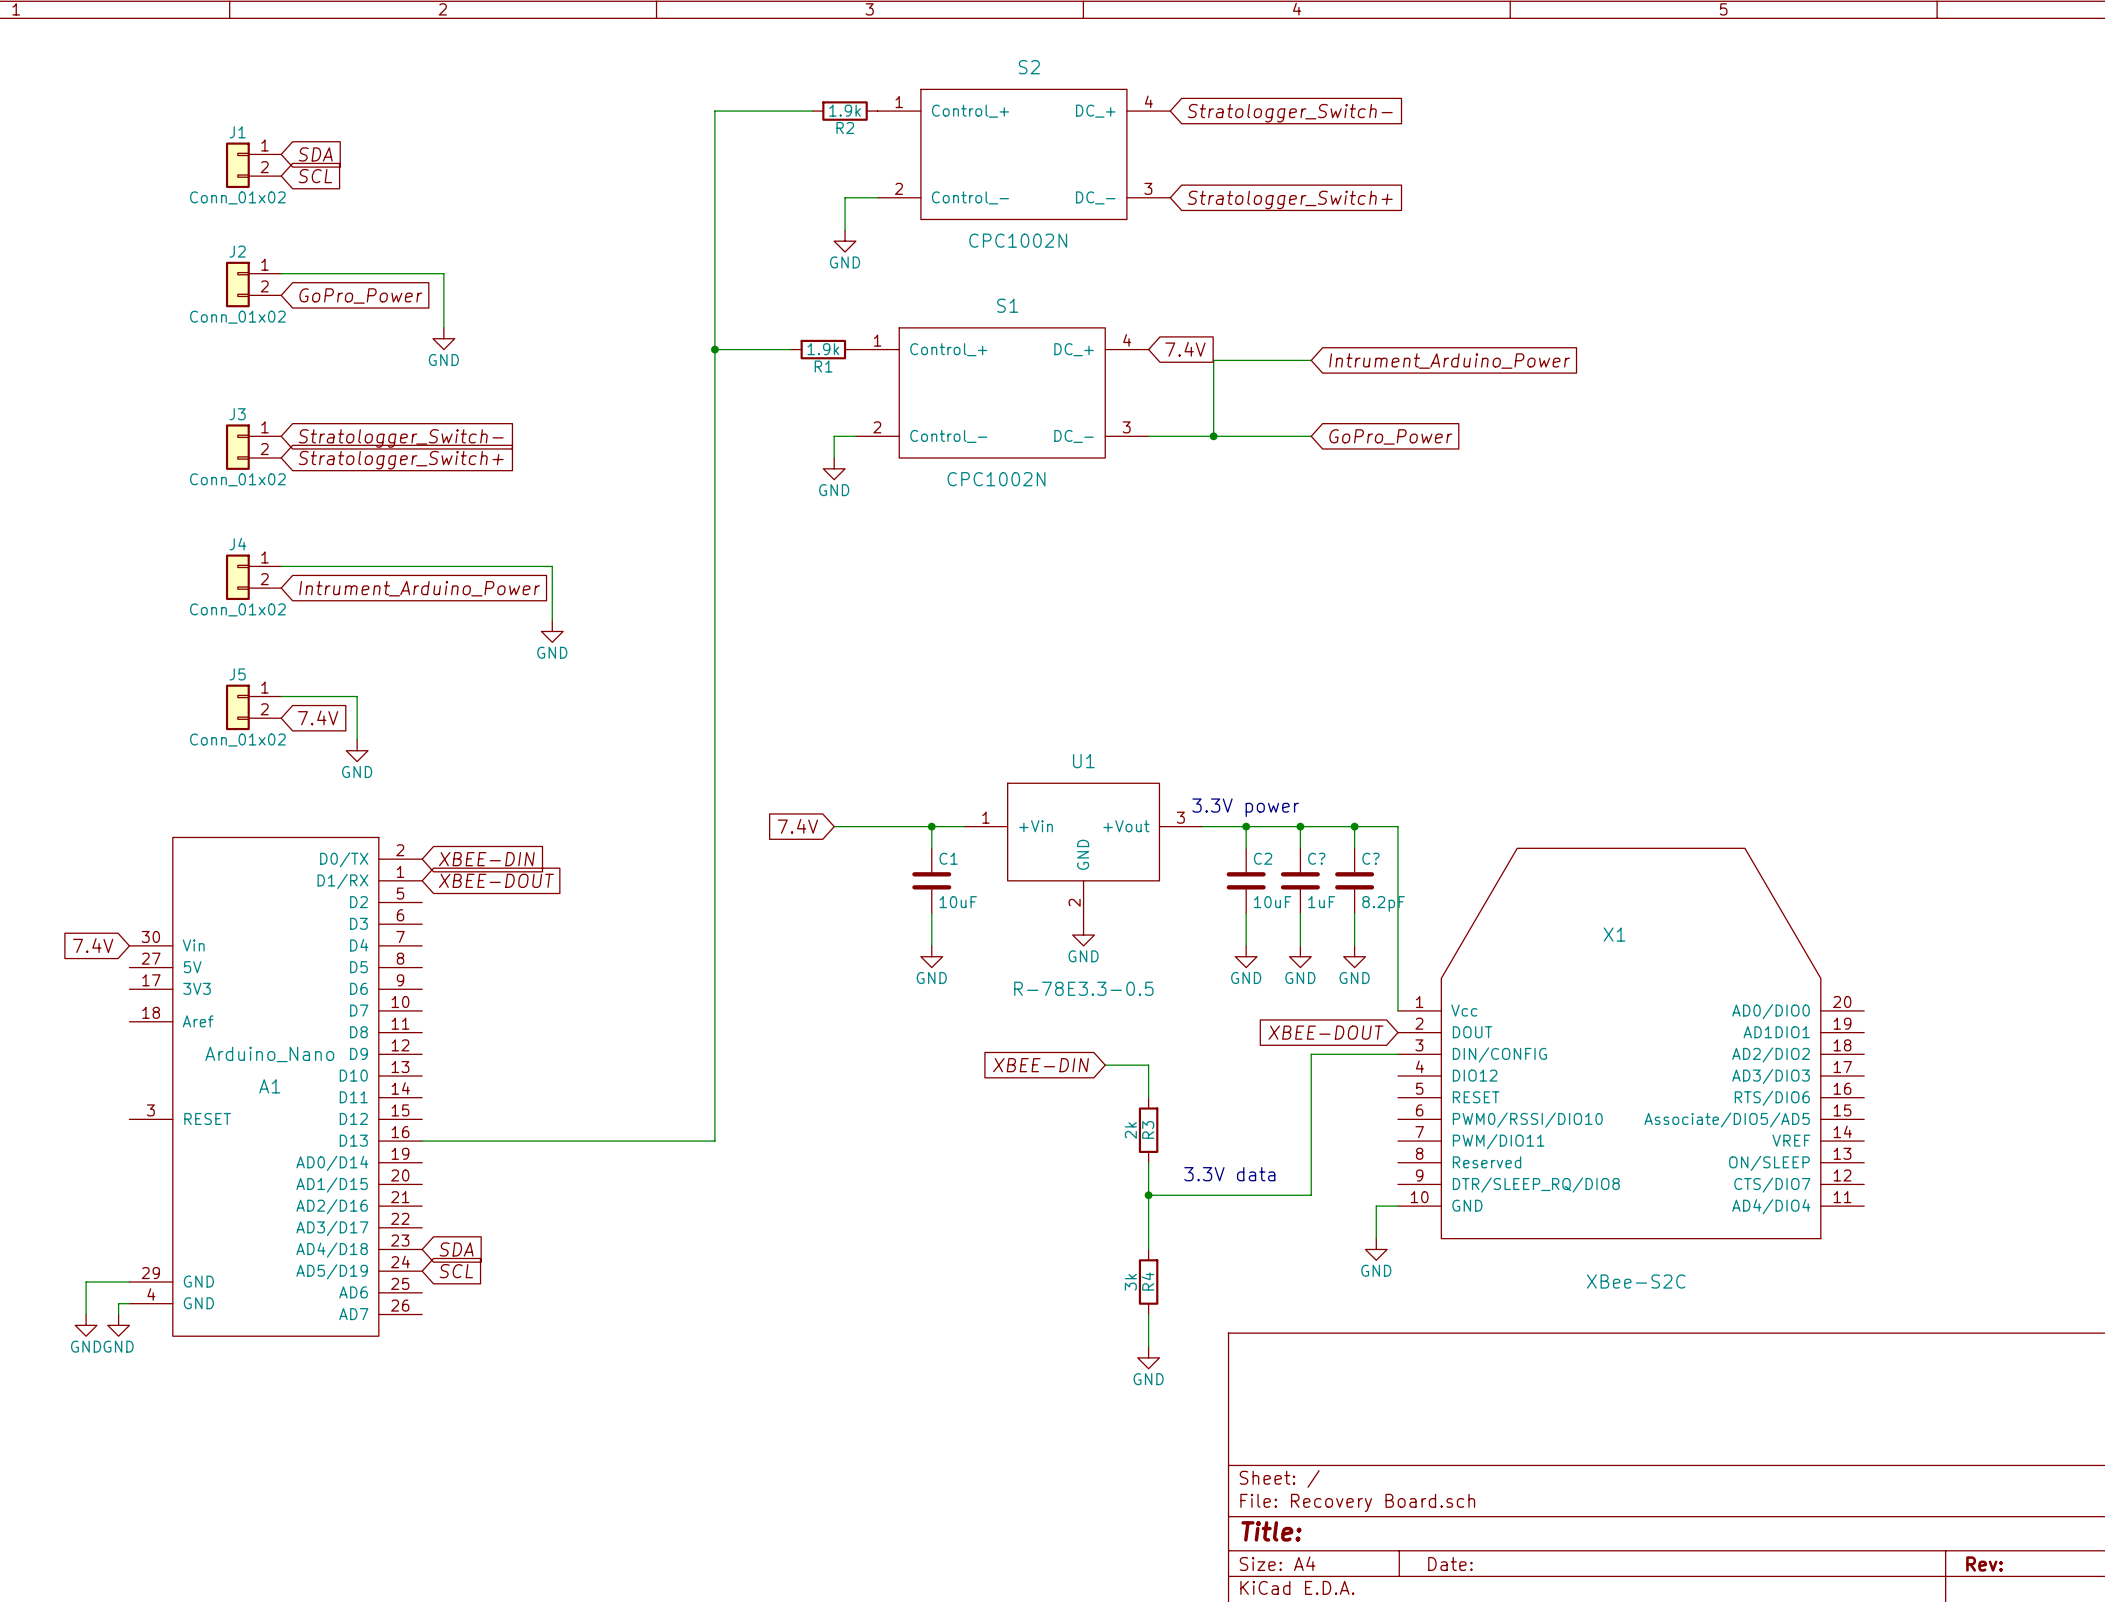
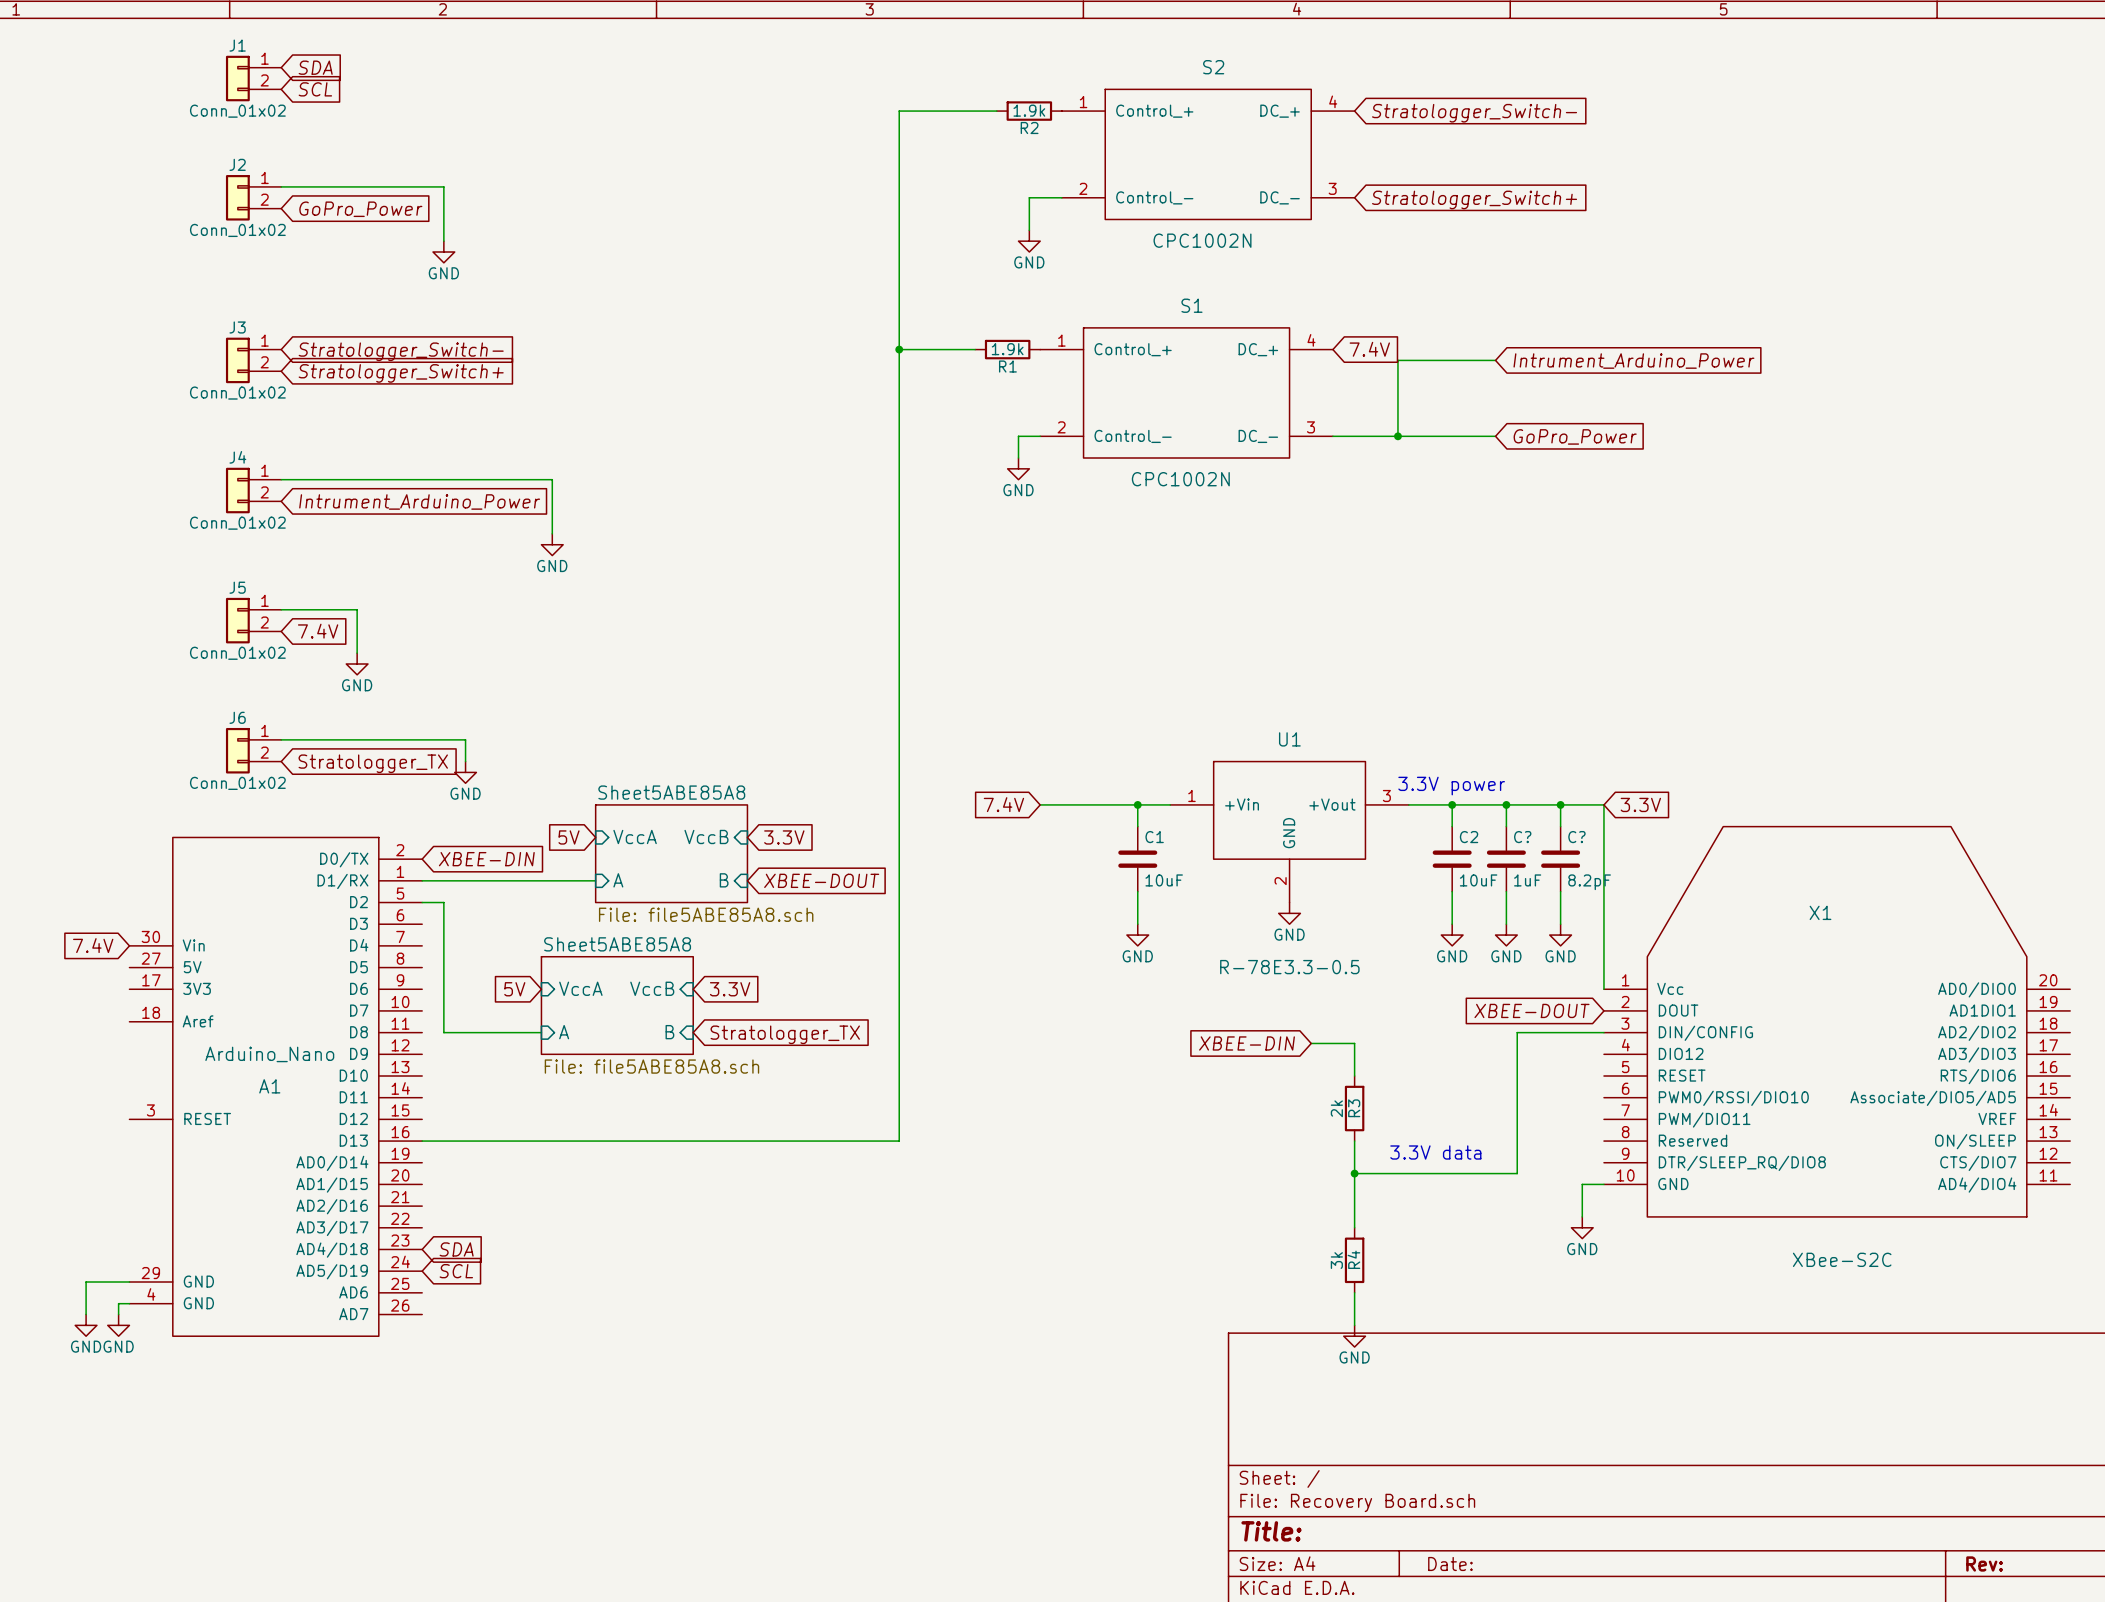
wire: (812, 111) (714, 111) (714, 1141) -> (996, 111) (899, 111) (899, 1141) (714, 1141)
R2 position: (845, 111) -> (1029, 111)
global label position: Stratologger_Switch- (1290, 113) -> Stratologger_Switch- (1474, 113)
global label position: SDA (315, 154) -> SDA (315, 67)
S2 position: (1023, 154) -> (1208, 154)
J1 position: (253, 165) -> (253, 78)
global label position: SCL (315, 176) -> SCL (315, 89)
wire: (877, 197) (845, 197) (845, 230) -> (1061, 197) (1029, 197) (1029, 230)
global label position: Stratologger_Switch+ (1290, 199) -> Stratologger_Switch+ (1474, 199)
power symbol: GND (845, 241) -> none
power symbol: none -> GND (1029, 241)
wire: (281, 273) (443, 273) (443, 327) -> (281, 186) (443, 186) (443, 241)
J2 position: (253, 284) -> (253, 197)
global label position: GoPro_Power (360, 295) -> GoPro_Power (360, 209)
power symbol position: GND (443, 338) -> GND (443, 252)
wire: (714, 349) (790, 349) -> (899, 349) (975, 349)
junction: (714, 349) -> none
R1 position: (823, 349) -> (1007, 349)
junction: none -> (899, 349)
global label position: 7.4V (1185, 349) -> 7.4V (1369, 349)
wire: (1311, 360) (1213, 360) (1213, 436) -> (1495, 360) (1397, 360) (1397, 436)
global label position: Intrument_Arduino_Power (1449, 361) -> Intrument_Arduino_Power (1633, 361)
S1 position: (1002, 392) -> (1186, 392)
wire: (855, 436) (834, 436) (834, 458) -> (1040, 436) (1018, 436) (1018, 458)
wire: (1148, 436) (1311, 436) -> (1332, 436) (1495, 436)
junction: (1213, 436) -> none
global label position: GoPro_Power (1390, 436) -> GoPro_Power (1575, 436)
junction: none -> (1397, 436)
global label position: Stratologger_Switch- (401, 438) -> Stratologger_Switch- (401, 351)
J3 position: (253, 447) -> (253, 360)
global label position: Stratologger_Switch+ (401, 460) -> Stratologger_Switch+ (401, 373)
power symbol: GND (834, 468) -> none
power symbol: none -> GND (1018, 468)
power symbol: none -> GND (552, 544)
wire: (281, 566) (552, 566) (552, 620) -> (281, 479) (552, 479) (552, 533)
J4 position: (253, 577) -> (253, 490)
global label position: Intrument_Arduino_Power (419, 588) -> Intrument_Arduino_Power (419, 501)
power symbol: GND (552, 631) -> none
power symbol: none -> GND (357, 664)
wire: (281, 696) (357, 696) (357, 739) -> (281, 609) (357, 609) (357, 653)
J5 position: (253, 707) -> (253, 620)
global label position: 7.4V (318, 717) -> 7.4V (318, 631)
wire: none -> (281, 739) (465, 739) (465, 761)
J6: none -> Conn_01x02 (253, 750)
power symbol: GND (357, 750) -> none
global label: none -> Stratologger_TX (373, 763)
power symbol: none -> GND (465, 772)
junction: none -> (1137, 804)
junction: none -> (1452, 804)
junction: none -> (1506, 804)
junction: none -> (1560, 804)
global label: none -> 3.3V (1640, 804)
text position: 3.3V power (1245, 807) -> 3.3V power (1451, 786)
global label position: 7.4V (797, 826) -> 7.4V (1003, 804)
wire: (834, 826) (964, 826) -> (1040, 804) (1170, 804)
wire: (931, 826) (931, 848) -> (1137, 804) (1137, 826)
junction: (931, 826) -> none
wire: (1202, 826) (1397, 826) (1397, 1010) -> (1408, 804) (1603, 804) (1603, 989)
wire: (1246, 826) (1246, 848) -> (1452, 804) (1452, 826)
junction: (1246, 826) -> none
wire: (1300, 826) (1300, 848) -> (1506, 804) (1506, 826)
junction: (1300, 826) -> none
wire: (1354, 826) (1354, 848) -> (1560, 804) (1560, 826)
junction: (1354, 826) -> none
sheet pin: none -> VccA (635, 836)
sheet pin: none -> VccB (706, 836)
global label: none -> 5V (569, 837)
global label: none -> 3.3V (784, 837)
sheet Sheet5ABE85A8: none -> File: file5ABE85A8.sch (671, 853)
U1 position: (1083, 853) -> (1289, 832)
wire: none -> (422, 880) (595, 880)
global label: XBEE-DOUT (496, 880) -> none
sheet pin: none -> A (618, 880)
sheet pin: none -> B (724, 880)
global label: none -> XBEE-DOUT (821, 880)
C1 position: (931, 880) -> (1137, 859)
C2 position: (1246, 880) -> (1452, 859)
C? position: (1300, 880) -> (1506, 859)
C? position: (1354, 880) -> (1560, 859)
wire: none -> (422, 902) (443, 902) (443, 1032) (541, 1032)
wire: (931, 913) (931, 945) -> (1137, 891) (1137, 924)
wire: (1246, 913) (1246, 945) -> (1452, 891) (1452, 924)
power symbol: none -> GND (1289, 913)
wire: (1300, 913) (1300, 945) -> (1506, 891) (1506, 924)
wire: (1354, 913) (1354, 945) -> (1560, 891) (1560, 924)
power symbol position: GND (1083, 935) -> GND (1137, 935)
power symbol: none -> GND (1452, 935)
power symbol: none -> GND (1506, 935)
power symbol: none -> GND (1560, 935)
power symbol: GND (931, 956) -> none
power symbol: GND (1246, 956) -> none
power symbol: GND (1300, 956) -> none
power symbol: GND (1354, 956) -> none
sheet pin: none -> VccA (580, 988)
sheet pin: none -> VccB (652, 988)
global label: none -> 5V (514, 989)
global label: none -> 3.3V (730, 989)
sheet Sheet5ABE85A8: none -> File: file5ABE85A8.sch (617, 1005)
sheet pin: none -> A (564, 1032)
sheet pin: none -> B (669, 1032)
global label position: XBEE-DOUT (1325, 1032) -> XBEE-DOUT (1531, 1010)
global label: none -> Stratologger_TX (785, 1034)
X1 position: (1631, 1043) -> (1837, 1021)
wire: (1397, 1054) (1311, 1054) (1311, 1195) (1148, 1195) -> (1603, 1032) (1517, 1032) (1517, 1173) (1354, 1173)
global label position: XBEE-DIN (1040, 1065) -> XBEE-DIN (1246, 1043)
wire: (1105, 1065) (1148, 1065) (1148, 1097) -> (1311, 1043) (1354, 1043) (1354, 1076)
2k position: (1148, 1130) -> (1354, 1108)
wire: (1148, 1162) (1148, 1249) -> (1354, 1141) (1354, 1227)
junction: none -> (1354, 1173)
text position: 3.3V data (1229, 1174) -> 3.3V data (1435, 1152)
junction: (1148, 1195) -> none
wire: (1397, 1206) (1376, 1206) (1376, 1238) -> (1603, 1184) (1582, 1184) (1582, 1216)
power symbol: none -> GND (1582, 1227)
power symbol position: GND (1376, 1249) -> GND (1354, 1336)
3k position: (1148, 1282) -> (1354, 1260)
wire: (1148, 1314) (1148, 1347) -> (1354, 1292) (1354, 1325)
power symbol: GND (1148, 1357) -> none

